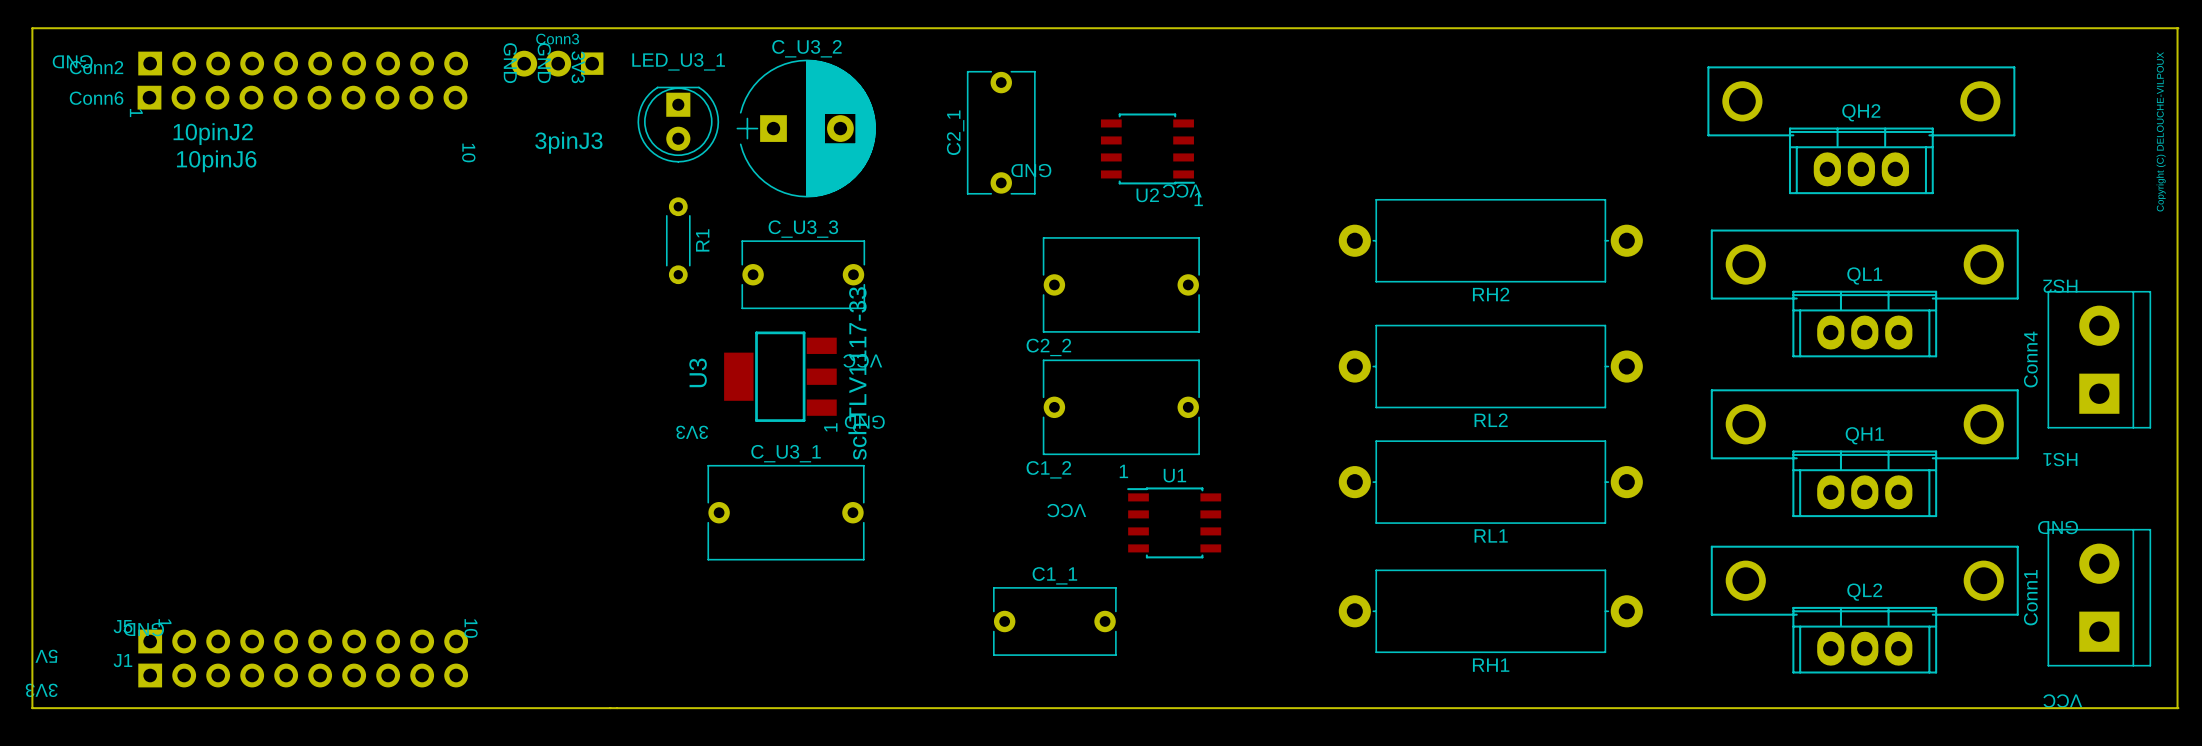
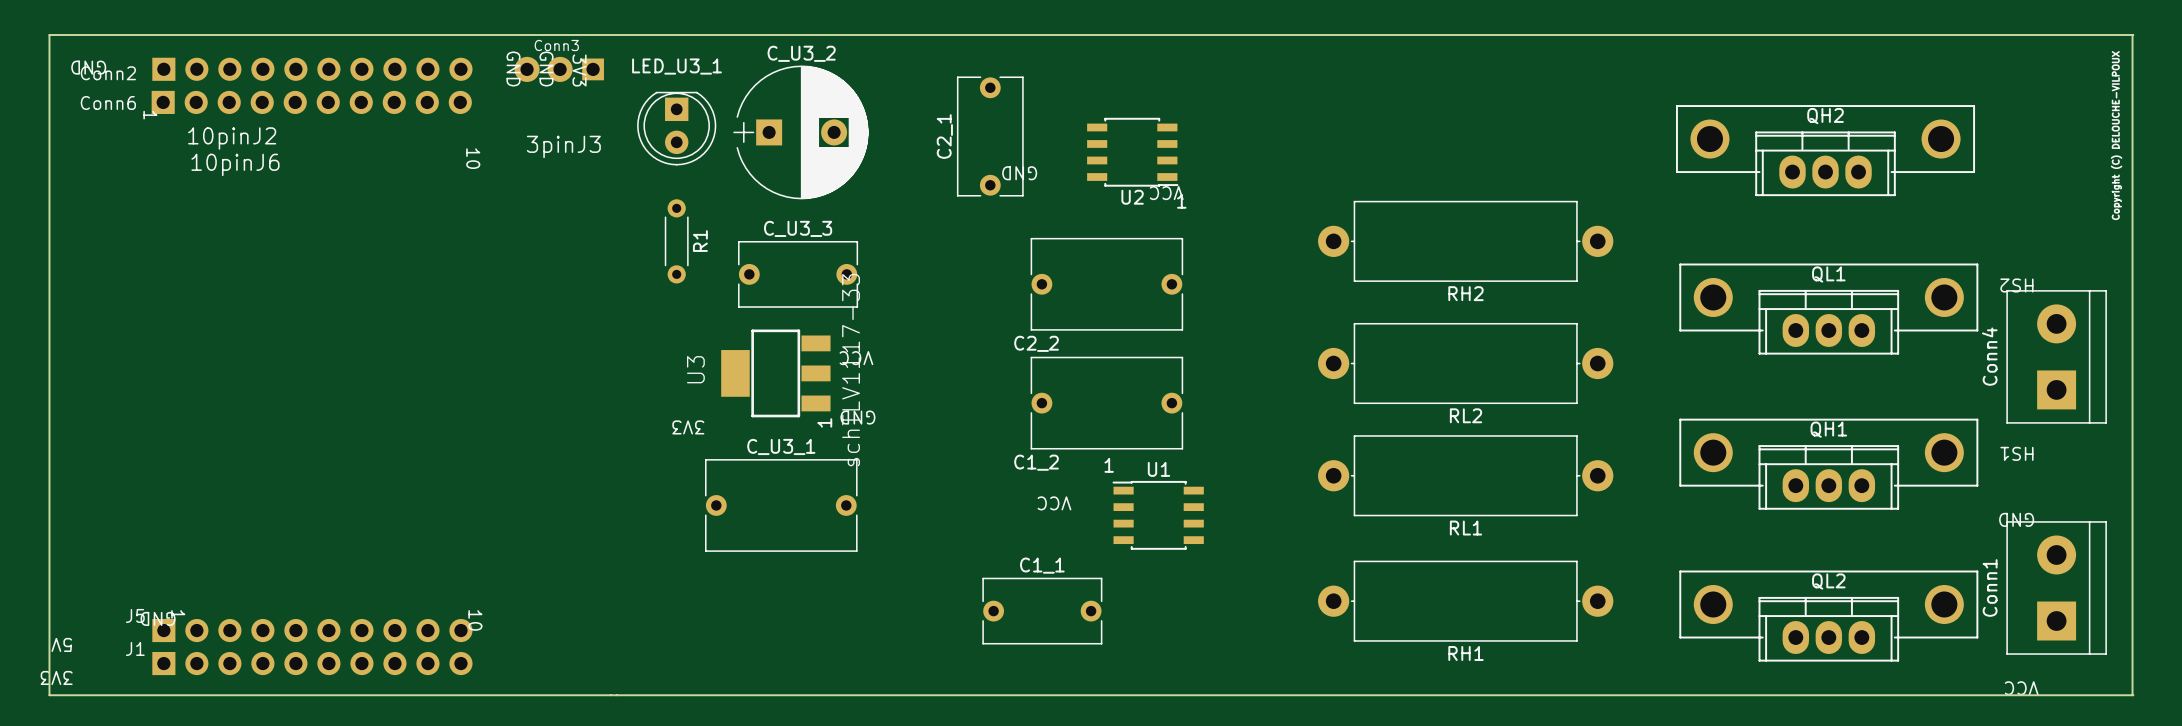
QH2 footprint: [1707, 66, 2016, 195] -> [1675, 105, 1976, 197]
QL1 footprint: [1710, 229, 2019, 358] -> [1679, 263, 1979, 355]
QH1 footprint: [1710, 389, 2019, 518] -> [1679, 418, 1979, 510]
QL2 footprint: [1710, 545, 2019, 674] -> [1679, 570, 1979, 662]

